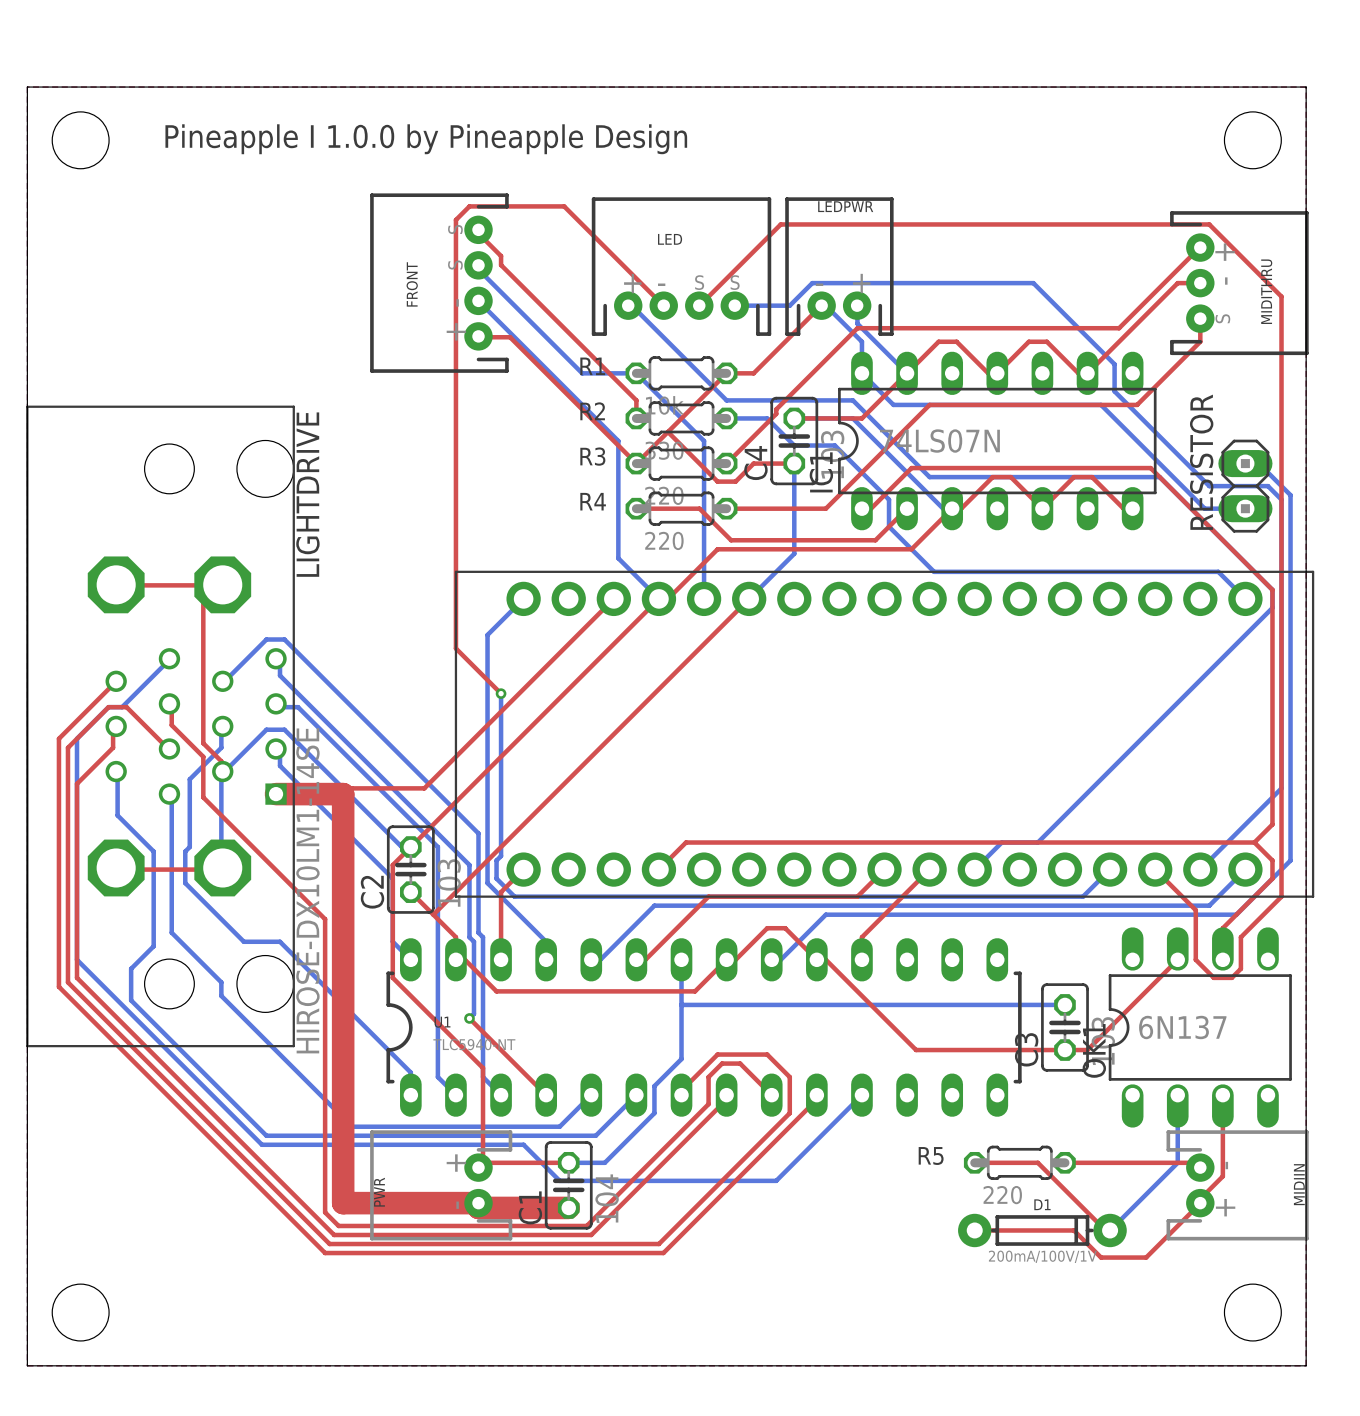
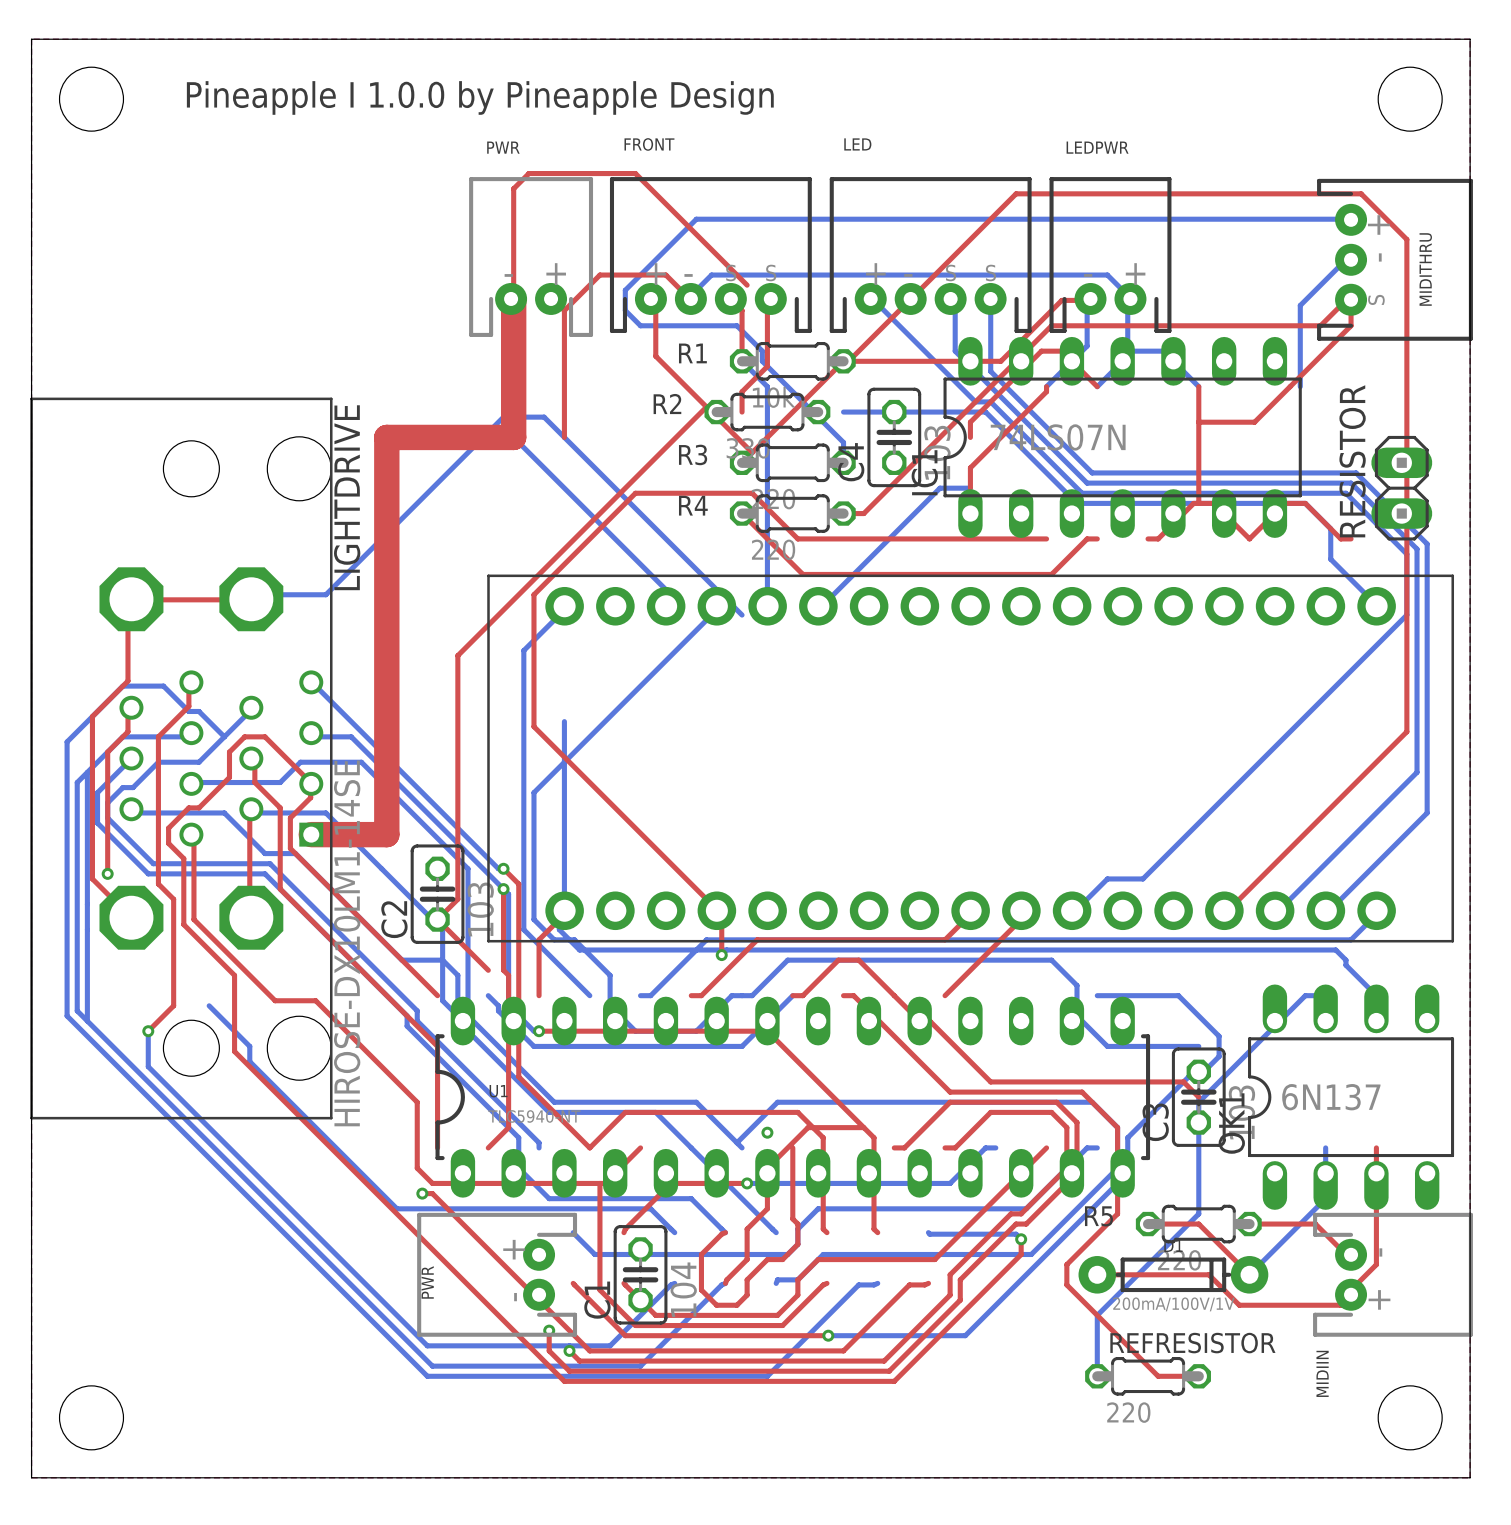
LEDPWR name position: LEDPWR (845, 206) -> LEDPWR (1097, 147)
top track: (902, 224) (780, 224) (699, 305) -> (1016, 193) (924, 285)
top track: (478, 229) (478, 233) (501, 256) (501, 265) (636, 400) (636, 418) -> none
LED name position: LED (670, 239) -> LED (857, 144)
bottom track: none -> (1350, 219) (696, 219) (625, 290) (625, 310) (640, 325) (736, 325) (762, 351) (762, 361) (843, 442) (843, 462)
top track: (1200, 247) (1119, 328) (857, 328) (776, 409) (776, 413) (726, 463) -> none
bottom track: (478, 265) (478, 269) (582, 373) (636, 373) (704, 441) (704, 598) -> none
top track: (1249, 265) (1281, 296) (1281, 896) (1240, 937) (1240, 968) (1231, 977) (1213, 977) (1195, 959) (1195, 910) (1155, 869) -> (1406, 239) (1406, 731) (1229, 909) (1224, 910)
LED position: (681, 266) -> (930, 255)
LEDPWR position: (839, 266) -> (1110, 255)
PWR: none -> (531, 257)
bottom track: none -> (1350, 259) (1345, 259) (1300, 305) (1300, 386)
FRONT rotation: 0° (439, 283) -> 90° clockwise (710, 255)
FRONT position: (439, 283) -> (710, 255)
top track: (1200, 283) (1177, 283) (1087, 373) (1078, 373) (1046, 341) -> (1350, 298) (1345, 300) (1320, 325) (1178, 325)
FRONT name position: FRONT (412, 284) -> FRONT (649, 144)
bottom track: (478, 301) (618, 441) (618, 558) -> (251, 599) (254, 594) (325, 594) (503, 417) (544, 417) (696, 569)
bottom track: (628, 305) (631, 305) (726, 400) (852, 400) (929, 477) (1159, 477) (1272, 589) (1272, 607) (1037, 842) (1001, 842) (974, 869) -> none
bottom track: (734, 305) (789, 305) (812, 283) (1033, 283) (1114, 364) (1114, 391) (1209, 486) (1267, 486) (1281, 499) (1281, 788) (1200, 869) -> none
bottom track: (821, 305) (825, 305) (861, 341) (861, 373) (893, 404) (1101, 404) (1204, 508) (1245, 508) -> none
bottom track: (857, 305) (857, 323) (907, 373) -> none
top track width: thin (455, 317) (455, 441) -> thick (513, 298) (513, 437)
top track: none -> (650, 298) (655, 300) (655, 356) (752, 452)
top track: none -> (690, 298) (665, 275) (599, 275) (564, 310)
bottom track: none -> (690, 298) (691, 295) (711, 275) (1107, 275) (1130, 298) (1127, 300) (1127, 356) (1097, 386)
top track: none -> (730, 298) (742, 310) (742, 361)
top track: none -> (770, 298) (767, 300) (767, 366) (742, 391) (742, 412)
bottom track: none -> (870, 298) (975, 401) (990, 401) (1082, 493) (1345, 493) (1406, 554) (1406, 615) (1142, 878) (1107, 878) (1076, 909) (1072, 910)
bottom track: none -> (950, 298) (955, 300) (955, 351) (1087, 483) (1351, 483) (1417, 549) (1417, 772) (1279, 909) (1275, 910)
bottom track: none -> (990, 298) (990, 371) (1092, 472) (1356, 472) (1427, 544) (1427, 812) (1330, 909) (1325, 910)
top track: none -> (1090, 298) (1061, 300) (1000, 361) (848, 361)
bottom track: none -> (1090, 298) (1087, 300) (1087, 346) (1046, 386)
top track: none -> (564, 310) (564, 437)
top track: (478, 336) (510, 337) (636, 463) (726, 373) (749, 373) -> (742, 462) (843, 361)
top track: (938, 341) (861, 418) (794, 418) -> (1056, 325) (1051, 325) (863, 513)
top track: (956, 341) (988, 373) (997, 373) (1028, 341) -> (1076, 325) (1158, 325)
bottom track: none -> (1127, 351) (1163, 351) (1198, 386)
bottom track: none -> (742, 361) (767, 386) (767, 606)
R1 position: (681, 373) -> (792, 361)
top track: none -> (1046, 386) (1046, 391) (970, 467) (970, 488)
top track: none -> (1097, 386) (1061, 351) (1041, 351) (970, 422) (970, 437)
top track: none -> (1198, 386) (1198, 503)
top track: (1137, 404) (929, 404) (825, 508) (767, 508) -> (1279, 396) (1254, 422) (1198, 422)
bottom track: (726, 418) (749, 418) -> none
bottom track: (767, 418) (794, 445) (834, 445) (889, 499) (889, 526) (934, 571) (1218, 571) (1245, 598) -> (863, 412) (894, 412)
bottom track: (852, 418) (943, 508) (952, 508) -> (960, 412) (985, 412) (1076, 503) (1305, 503) (1330, 528) (1330, 559) (1376, 606)
top track: (667, 431) (717, 481) (735, 481) (753, 463) (794, 463) -> none
top track: (455, 441) (455, 648) (501, 693) -> (513, 437) (386, 437) (386, 834)
bottom track: none -> (513, 437) (665, 589) (666, 606)
R3 position: (681, 463) -> (792, 462)
bottom track: (794, 463) (794, 553) (749, 598) -> none
bottom track: (1245, 463) (1258, 463) (1290, 495) (1290, 860) (1236, 914) (825, 914) (780, 959) (771, 959) -> none
bottom track: none -> (970, 488) (939, 488) (823, 604) (818, 606)
top track: (636, 508) (699, 508) (731, 540) (875, 540) (907, 508) -> none
top track: none -> (742, 513) (802, 574) (1051, 574) (1087, 538) (1097, 538)
R4 position: (681, 508) -> (792, 513)
top track: (726, 508) (749, 508) -> none
top track: (861, 508) (870, 508) (911, 468) (1150, 468) (1272, 589) (1272, 824) (1254, 842) -> none
top track: (1132, 508) (1123, 508) (1092, 477) (1073, 477) (1042, 508) (1010, 477) (992, 477) (961, 508) (952, 508) (911, 549) (717, 549) (667, 598) (658, 598) (406, 851) -> (706, 406) (457, 655) (457, 899)
top track: none -> (1046, 538) (797, 538) (752, 493) (635, 493) (533, 594) (533, 726) (721, 914) (721, 955)
top track: none -> (1148, 538) (1158, 538) (1193, 503) (1214, 503) (1249, 538) (1285, 503) (1305, 503) (1340, 538) (1351, 538)
top track: (222, 584) (203, 585) (203, 720) -> (437, 995) (290, 848) (290, 818) (310, 797) (310, 782) (265, 736) (244, 736) (229, 752)
bottom track: none -> (564, 606) (564, 609) (523, 650) (523, 929) (589, 995)
bottom track: (523, 598) (487, 635) (487, 883) -> (716, 589) (716, 609) (533, 792) (533, 919) (549, 934)
top track: (613, 598) (424, 788) (352, 788) (343, 794) (343, 1203) (478, 1203) (478, 1207) (568, 1207) -> none
top track: (749, 598) (433, 914) (455, 937) (455, 959) (464, 959) (496, 991) (695, 991) (726, 959) (735, 959) (767, 928) (785, 928) -> (792, 995) (802, 995) (838, 960) (858, 960) (884, 985)
top track: none -> (191, 682) (188, 686) (188, 706) (158, 736) (158, 884) (173, 899) (173, 1005) (148, 1031)
bottom track: (169, 658) (122, 707) -> (191, 733) (188, 736) (138, 736)
bottom track: (280, 662) (280, 675) (311, 707) -> (315, 686) (498, 868) (503, 868)
bottom track: (222, 681) (266, 639) (284, 639) (478, 833) (478, 932) (483, 937) (483, 1077) (501, 1095) -> (251, 707) (199, 762) (158, 762) (133, 787) (122, 787) (107, 802) (107, 818) (153, 863) (270, 863) (417, 1010) (417, 1021) (539, 1142) (539, 1147)
top track: (113, 684) (58, 738) (58, 986) (325, 1253) (523, 1253) -> (422, 1193) (432, 1193) (589, 1350)
via: (501, 693) -> none
top track: (169, 703) (171, 707) (171, 725) (203, 756) (203, 797) (248, 842) -> (251, 758) (254, 762) (254, 782) (280, 807) (280, 889)
top track: (108, 707) (126, 707) (169, 748) -> (122, 736) (127, 731) (127, 711)
bottom track: none -> (224, 736) (199, 711) (188, 711) (163, 686) (122, 686) (67, 741) (67, 1015) (427, 1376) (767, 1376) (858, 1284) (877, 1283)
bottom track: (298, 707) (320, 729) -> (336, 736) (351, 736)
top track: (95, 720) (67, 747) (67, 982) (329, 1244) (658, 1244) (789, 1113) (789, 1077) (776, 1063) -> (107, 752) (107, 873)
top track: (116, 726) (113, 729) (113, 747) (77, 783) (77, 977) (334, 1235) (591, 1235) (726, 1099) (726, 1095) -> none
bottom track: (222, 726) (221, 747) (189, 779) (189, 847) (185, 851) (185, 883) (243, 941) (280, 941) (410, 1072) (410, 1095) -> none
bottom track: (284, 729) (401, 847) (410, 847) -> (320, 762) (361, 762)
part position: (884, 734) -> (970, 758)
bottom track: none -> (87, 772) (77, 782) (77, 1010) (87, 1021)
top track: (203, 743) (221, 761) (222, 771) -> (251, 917) (249, 914) (249, 812) (251, 809)
top track: none -> (229, 777) (199, 807) (188, 807) (168, 828) (168, 843) (183, 858) (183, 924) (234, 975) (234, 1051) (564, 1381) (894, 1381) (1021, 1254) (1021, 1239)
bottom track: (248, 747) (221, 774) (222, 867) -> (280, 782) (191, 783)
bottom track: (276, 748) (280, 752) (280, 765) (289, 774) -> (251, 809) (254, 812) (325, 812)
bottom track: (117, 774) (117, 815) -> (131, 758) (97, 792) (97, 823) (133, 858)
bottom track: none -> (133, 812) (224, 812) (265, 853) (295, 853) (402, 960) (442, 960) (457, 975) (457, 1021) (549, 1112) (655, 1112) (776, 1232)
top track: none -> (191, 834) (193, 838) (193, 919) (275, 1000) (315, 1000) (417, 1102) (417, 1168) (432, 1183) (605, 1183) (640, 1147)
bottom track: (169, 794) (171, 797) (171, 932) (185, 946) -> none
bottom track: (415, 824) (437, 847) (437, 1077) (455, 1095) -> (468, 868) (468, 1015) (554, 1102) (696, 1102) (742, 1147)
top track: none -> (503, 868) (518, 884) (518, 1076) (528, 1087)
via: none -> (503, 868)
via: none -> (107, 873)
bottom track: (131, 828) (153, 851) (153, 946) (131, 968) -> (148, 873) (265, 873) (407, 1015) (407, 1026) (518, 1137) (518, 1168) (549, 1198) (691, 1198) (725, 1232)
top track: none -> (503, 889) (503, 970) (508, 975) (508, 1127) (488, 1147)
via: none -> (503, 889)
top track: (1254, 842) (1272, 860) (1272, 878) (1222, 928) (1222, 959) -> none
top track: (1254, 842) (686, 842) (658, 869) -> none
bottom track: (451, 847) (469, 865) (469, 937) (473, 941) (473, 1013) (469, 1018) -> (508, 894) (508, 1005) (533, 1031) (539, 1031)
top track: none -> (564, 910) (564, 914) (539, 939) (539, 995)
top track: none -> (970, 910) (970, 914) (945, 939) (757, 939) (701, 995) (691, 995)
top track: none -> (1021, 910) (1026, 914) (945, 995)
bottom track: none -> (1376, 910) (1376, 914) (1351, 939) (706, 939) (650, 995) (640, 995)
top track: (392, 865) (392, 977) (483, 1068) (483, 1162) -> (442, 914) (437, 919) (462, 944)
top track: (116, 867) (117, 869) (221, 869) (222, 867) -> (131, 917) (92, 878) (92, 716) (127, 681) (127, 599) (131, 599)
C2 position: (410, 869) -> (437, 894)
top track: (523, 869) (501, 892) (501, 959) -> none
top track: (884, 869) (857, 896) (708, 896) (645, 959) (636, 959) -> none
top track: (929, 869) (861, 937) (861, 959) -> none
bottom track: (1110, 869) (1083, 896) -> (1376, 995) (1345, 965) (1345, 960) (1335, 950) (1219, 950)
bottom track: (1245, 869) (1209, 905) (934, 905) -> (1198, 1046) (1107, 1046) (1076, 1015) (1076, 985) (1051, 960)
bottom track: (492, 887) (546, 941) (546, 959) -> none
via: none -> (721, 955)
bottom track: (699, 905) (654, 905) (600, 959) (591, 959) -> (787, 960) (752, 995) (731, 995) (696, 1031) (635, 1031) (610, 1005) (610, 975) (574, 939) (554, 939)
top track: (325, 919) (325, 1212) (338, 1225) (586, 1225) (708, 1104) (708, 1077) (722, 1063) (740, 1063) (771, 1095) -> (366, 975) (437, 1046) (437, 1147)
bottom track: none -> (488, 995) (498, 1005) (498, 1010) (533, 1046) (742, 1046) (792, 995)
top track: none -> (843, 995) (853, 995) (950, 1092) (1082, 1092) (1117, 1127) (1117, 1213) (1066, 1264) (1066, 1284) (1158, 1376) (1198, 1376)
bottom track: none -> (1097, 995) (1178, 995) (1219, 1036) (1219, 1056) (1198, 1076) (1188, 1076) (1127, 1137) (1127, 1173) (965, 1335) (828, 1335)
bottom track: none -> (1325, 995) (1305, 995) (1198, 1102)
bottom track: (681, 959) (681, 1059) (654, 1086) (654, 1113) (604, 1162) (568, 1162) -> none
top track: (1177, 959) (1087, 1050) (916, 1050) (880, 1013) -> (1198, 1097) (1183, 1081) (990, 1081)
via: none -> (148, 1031)
top track: none -> (539, 1031) (767, 1031) (863, 1127)
bottom track: (681, 1004) (1064, 1004) -> none
via position: (469, 1018) -> (539, 1031)
bottom track: none -> (1198, 1097) (1198, 1213) (1097, 1315) (1097, 1376)
via: none -> (767, 1132)
top track: none -> (874, 1137) (874, 1229) (877, 1232)
bottom track: none -> (736, 1142) (777, 1102) (1092, 1102) (1117, 1127) (1117, 1168) (1031, 1254) (823, 1254) (797, 1279) (777, 1279) (776, 1283)
top track: (523, 1072) (546, 1095) -> (589, 1147) (625, 1112) (797, 1112) (823, 1137) (823, 1229) (826, 1232)
top track: none -> (792, 1147) (792, 1218) (797, 1224) (797, 1244) (782, 1259) (767, 1259) (747, 1279) (747, 1295) (736, 1305) (716, 1305) (701, 1290) (701, 1254) (725, 1232)
top track: none -> (894, 1147) (904, 1147) (950, 1102) (1056, 1102) (1076, 1122) (1076, 1173) (1026, 1224) (1016, 1224) (960, 1279) (960, 1300) (889, 1371) (569, 1371) (549, 1350) (549, 1330)
top track: none -> (945, 1147) (955, 1147) (990, 1112) (1051, 1112) (1066, 1127) (1066, 1168) (1021, 1213) (1011, 1213) (950, 1274) (950, 1295) (884, 1361) (579, 1361) (569, 1350)
bottom track: none -> (995, 1147) (985, 1147) (950, 1183) (747, 1183)
top track: none -> (1046, 1147) (934, 1259) (818, 1259) (797, 1279) (797, 1295) (777, 1315) (655, 1315) (623, 1283)
bottom track: none -> (1097, 1147) (1087, 1147) (1026, 1208) (818, 1208) (797, 1229) (797, 1244) (787, 1254) (594, 1254) (573, 1232)
bottom track: none -> (1325, 1147) (1325, 1173)
top track: none -> (1376, 1147) (1376, 1173)
bottom track: (591, 1095) (559, 1126) -> (674, 1232) (650, 1208) (630, 1208)
bottom track: (636, 1095) (595, 1135) (266, 1135) -> (674, 1283) (610, 1345) (427, 1345) (300, 1218)
top track: none -> (767, 1173) (767, 1208) (747, 1229) (747, 1259) (725, 1283)
top track: (816, 1095) (816, 1099) (663, 1253) -> (928, 1283) (909, 1284) (843, 1350) (747, 1350)
bottom track: (861, 1095) (776, 1180) (559, 1180) (523, 1144) (261, 1144) -> (725, 1283) (640, 1366) (432, 1366) (295, 1229)
top track: none -> (599, 1183) (599, 1290) (635, 1325) (782, 1325) (826, 1283)
top track: none -> (747, 1183) (671, 1183) (623, 1232)
via: none -> (747, 1183)
via: none -> (422, 1193)
bottom track: (1177, 1117) (1177, 1162) (1110, 1230) -> (1325, 1198) (1249, 1274)
top track: none -> (1148, 1224) (1198, 1224) (1249, 1274)
top track: none -> (1249, 1224) (1315, 1224) (1350, 1258)
bottom track: none -> (928, 1232) (929, 1234) (1016, 1234) (1021, 1239)
via: none -> (1021, 1239)
top track: (483, 1162) (568, 1162) -> none
top track: (974, 1162) (1037, 1162) (1105, 1230) (1110, 1230) -> none
R5 position: (1019, 1162) -> (1198, 1224)
top track: (1064, 1162) (1195, 1162) (1200, 1167) -> none
MIDIIN name position: MIDIIN (1299, 1184) -> MIDIIN (1322, 1373)
top track: none -> (573, 1283) (625, 1335) (828, 1335)
top track: (1191, 1212) (1146, 1257) (1101, 1257) (1073, 1230) (974, 1230) -> (1340, 1305) (1239, 1305) (1208, 1274) (1097, 1274)
D1 position: (1042, 1230) -> (1173, 1274)
via: none -> (549, 1330)
via: none -> (828, 1335)
via: none -> (569, 1350)
REFRESISTOR: none -> 220 (1148, 1376)

